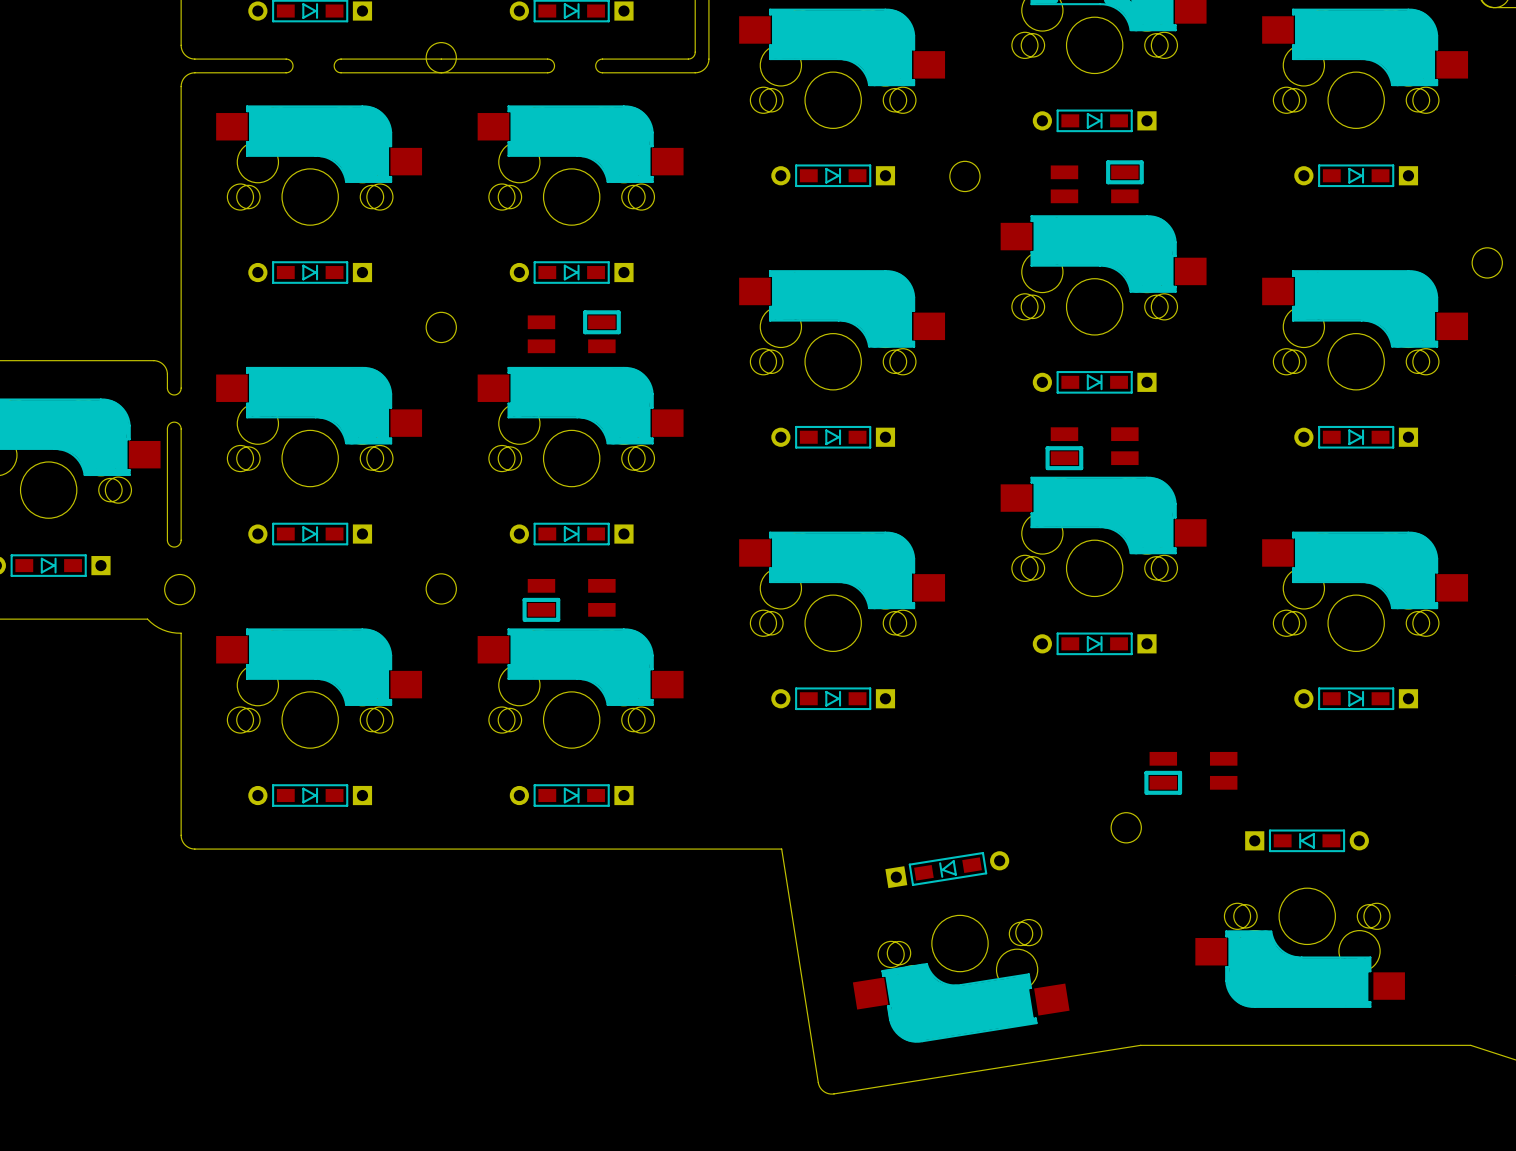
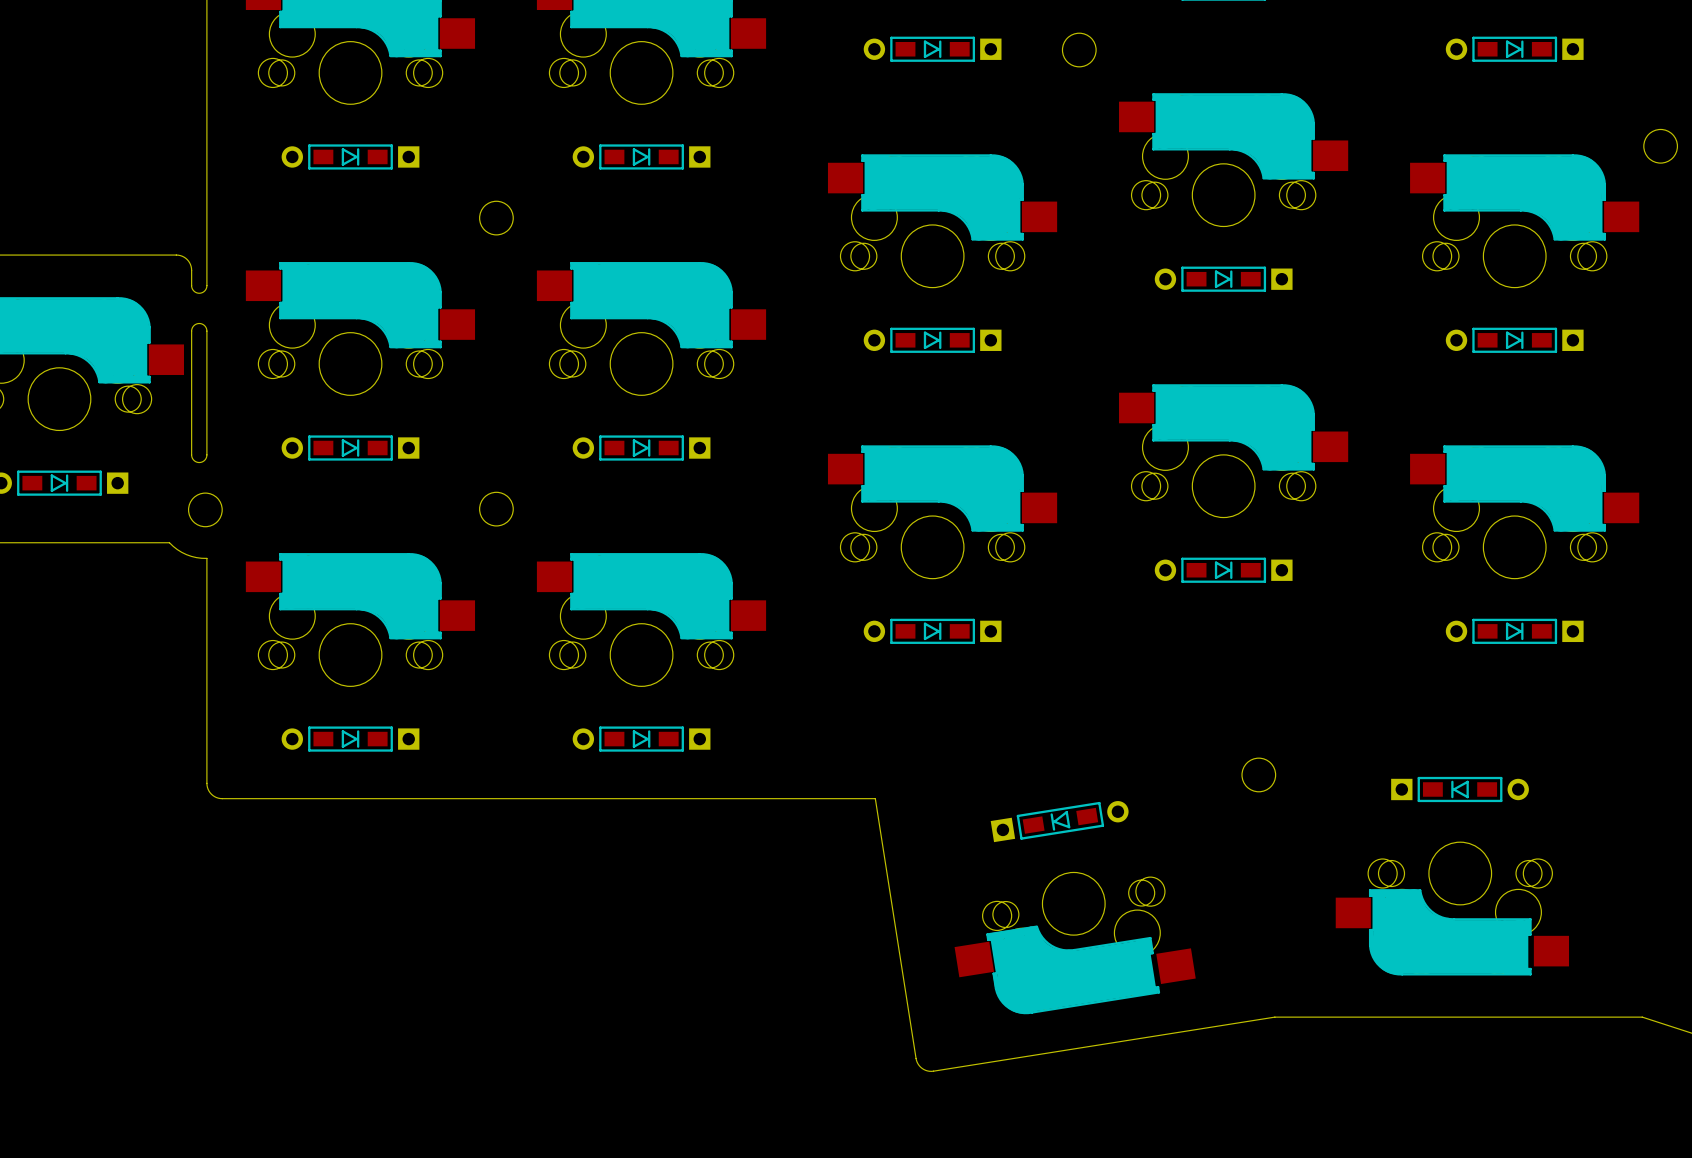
part: (1097, 181) -> none
part: (574, 331) -> none
part: (1092, 448) -> none
part: (569, 600) -> none
part: (1190, 773) -> none

